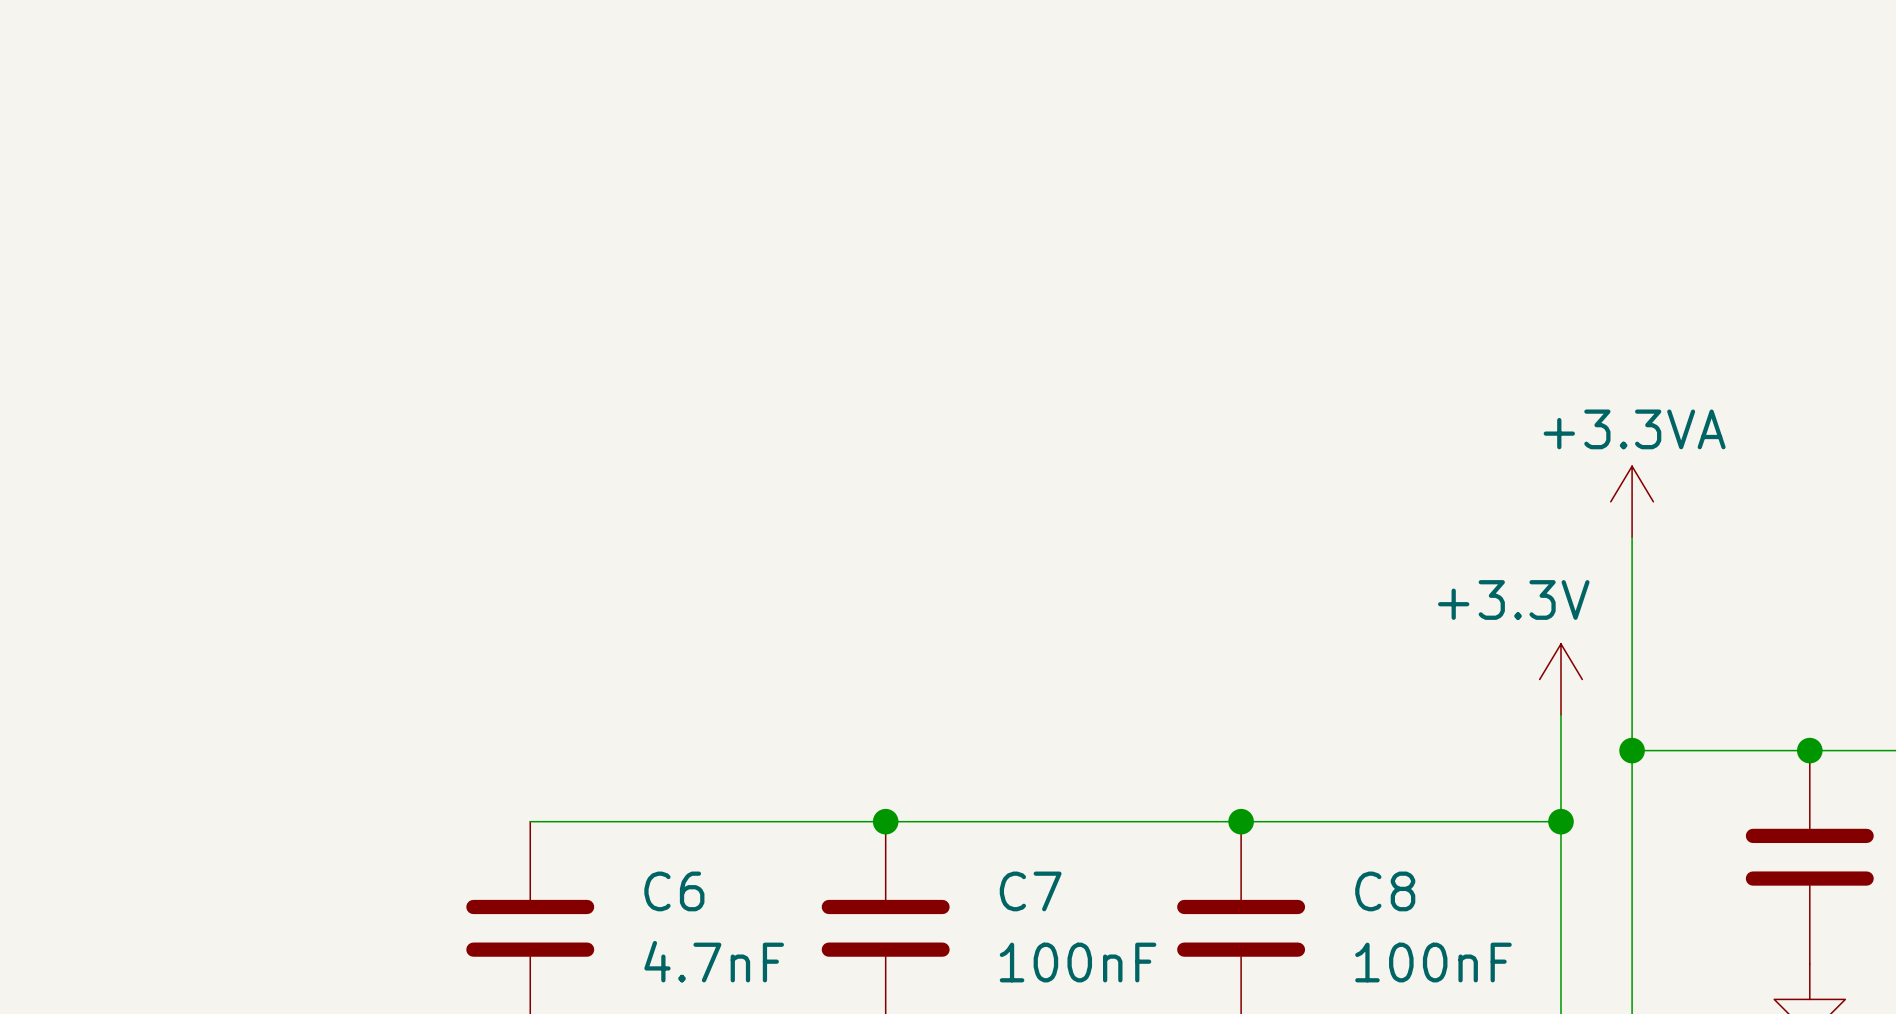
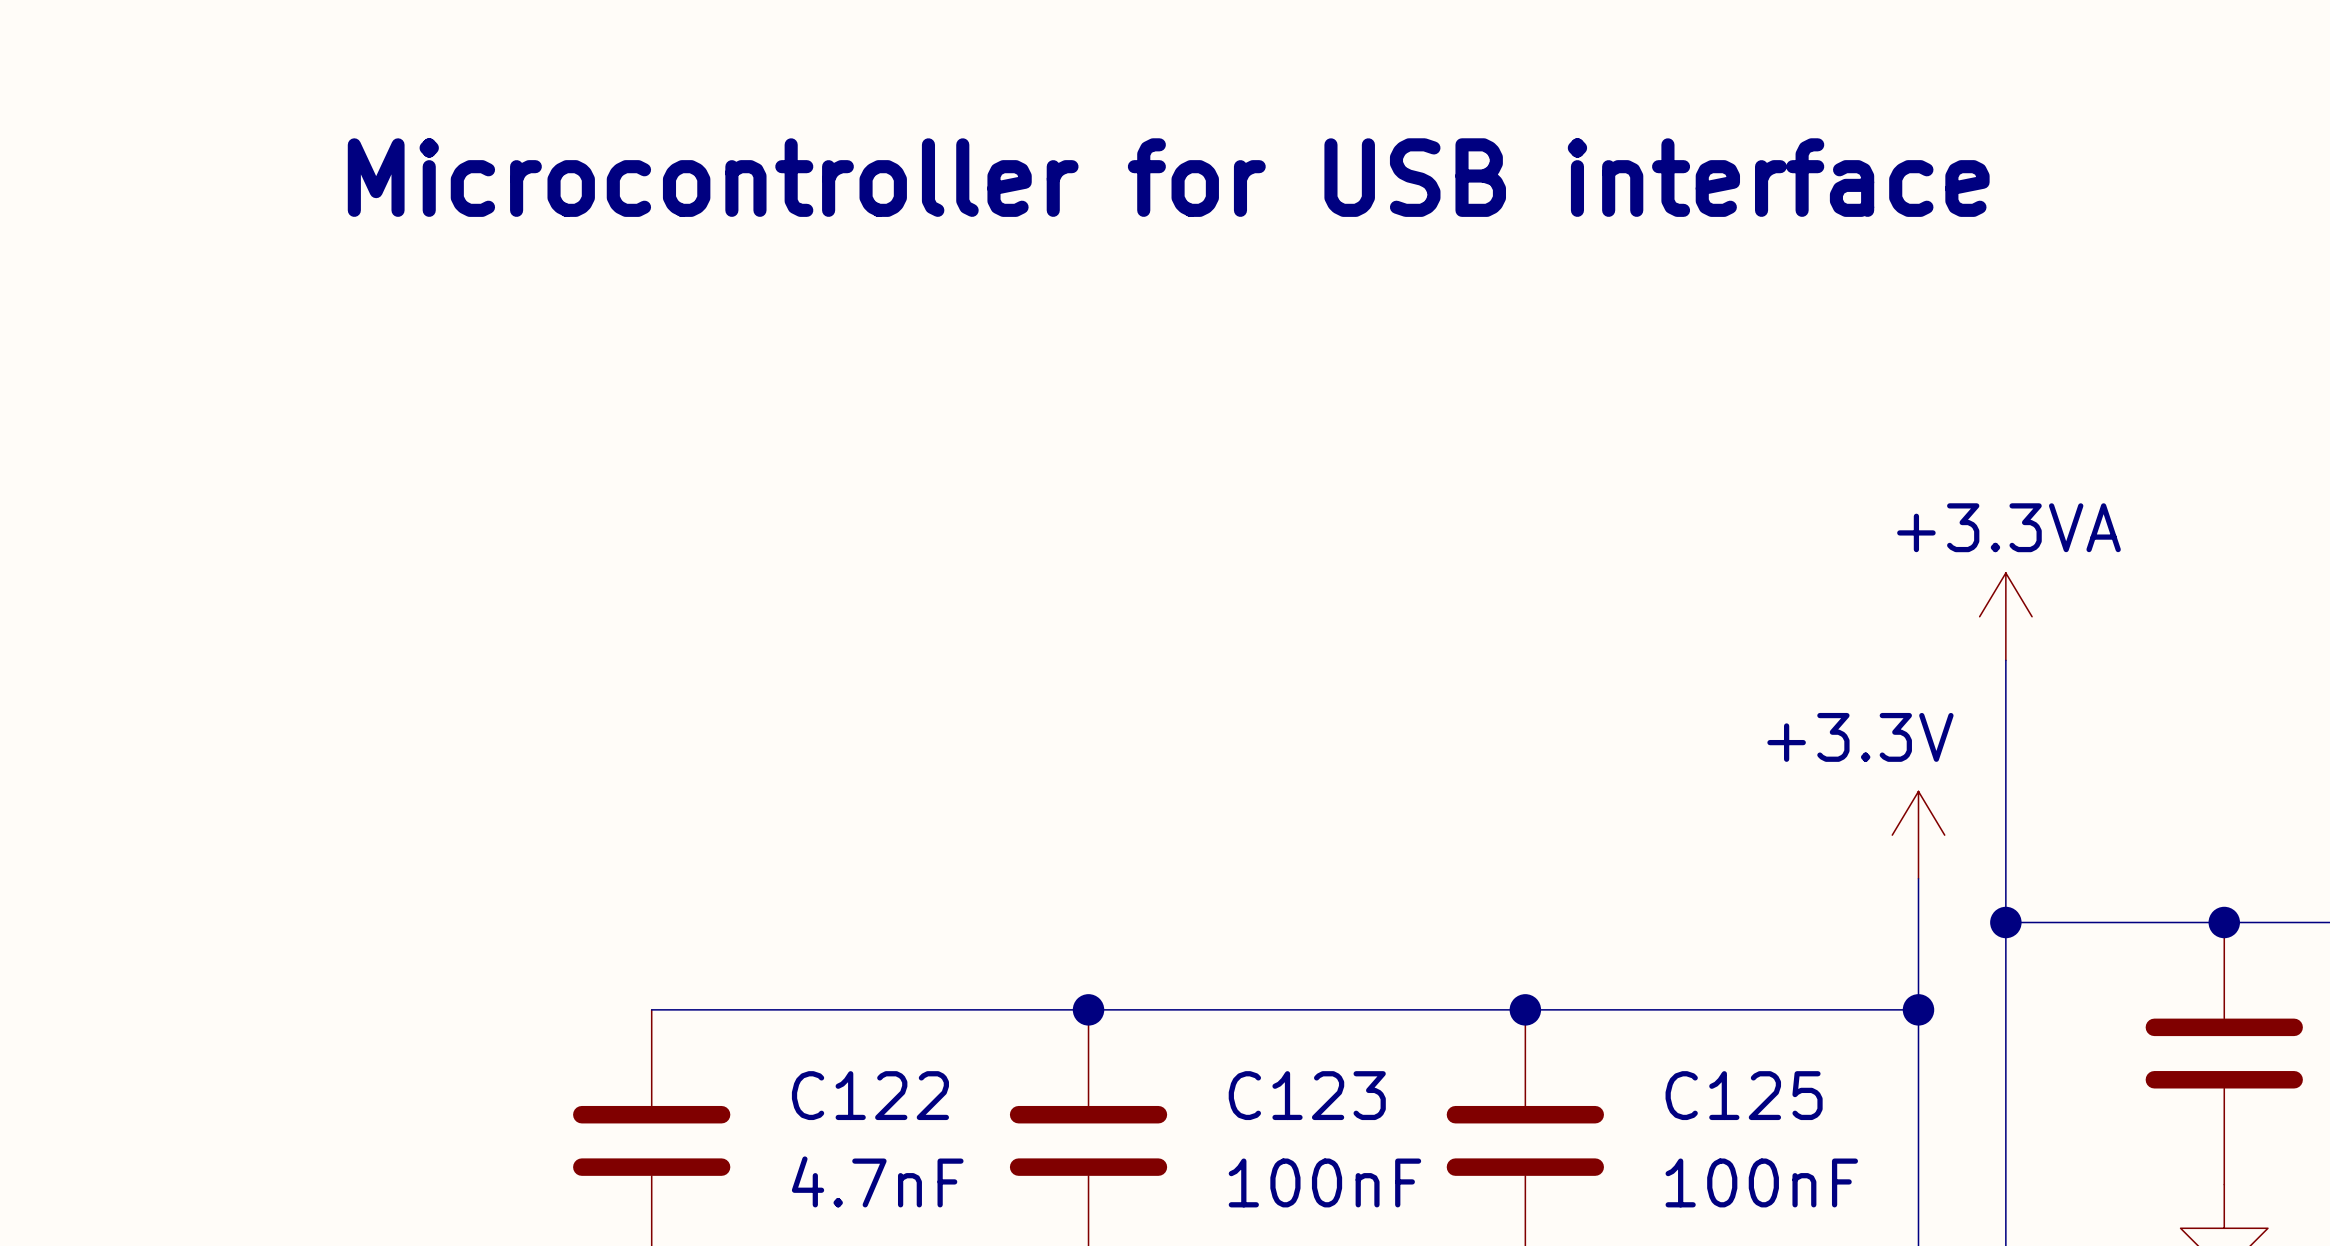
text: none -> Microcontroller for USB interface (1168, 177)
C6 name: C6 (674, 891) -> C122 (870, 1095)
C7 name: C7 (1030, 891) -> C123 (1307, 1095)
C8 name: C8 (1385, 891) -> C125 (1744, 1095)

